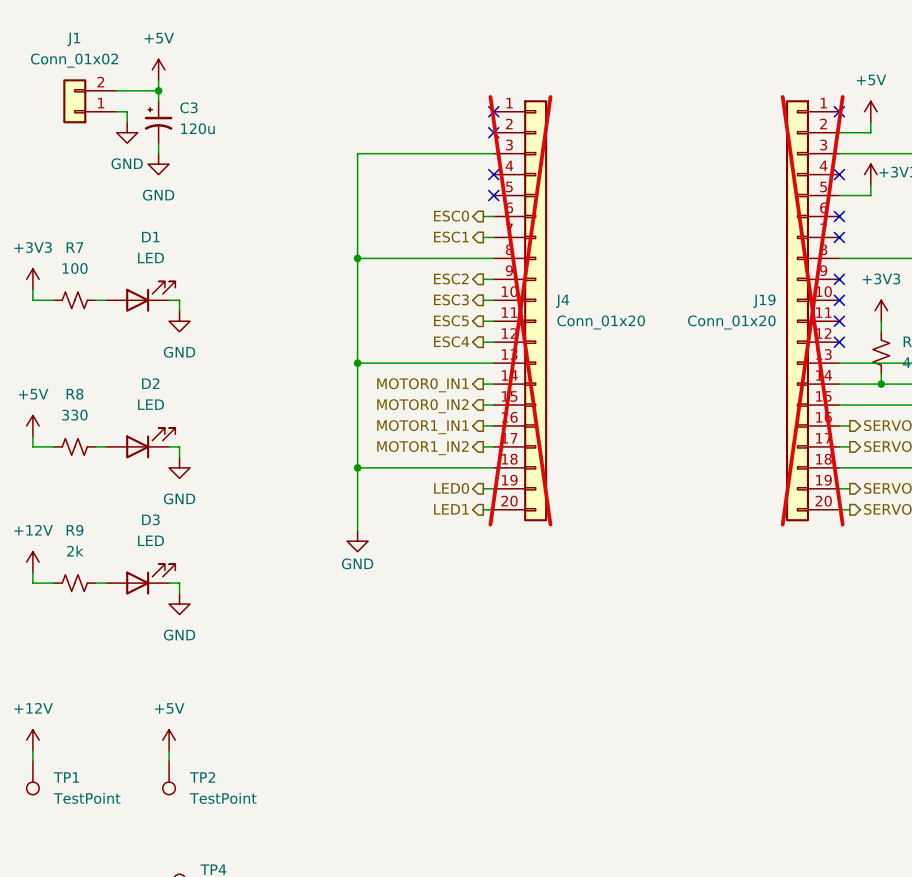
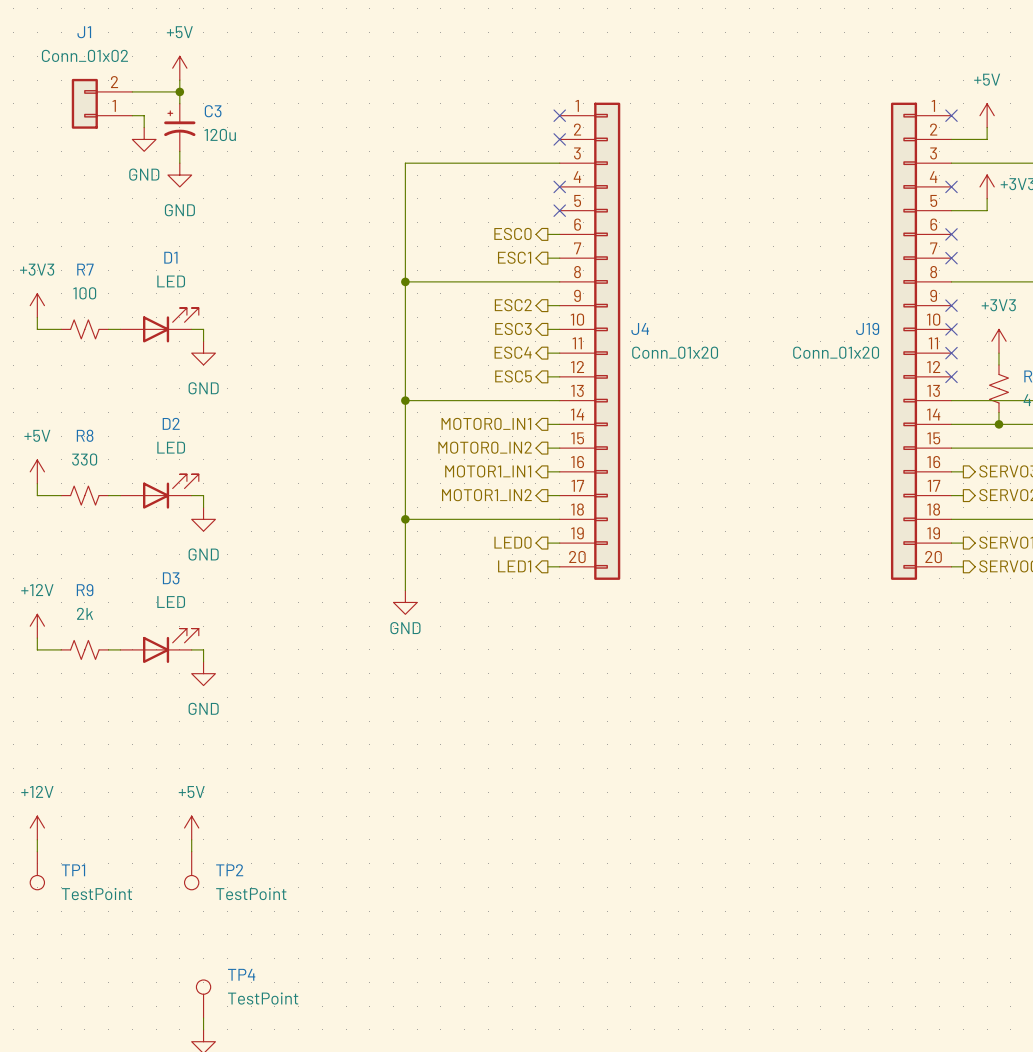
J4 do-not-place cross: (520, 310) -> none
J19 do-not-place cross: (812, 310) -> none
hierarchical label: ESC5 (451, 320) -> ESC4 (513, 352)
hierarchical label: ESC4 (451, 341) -> ESC5 (513, 376)

